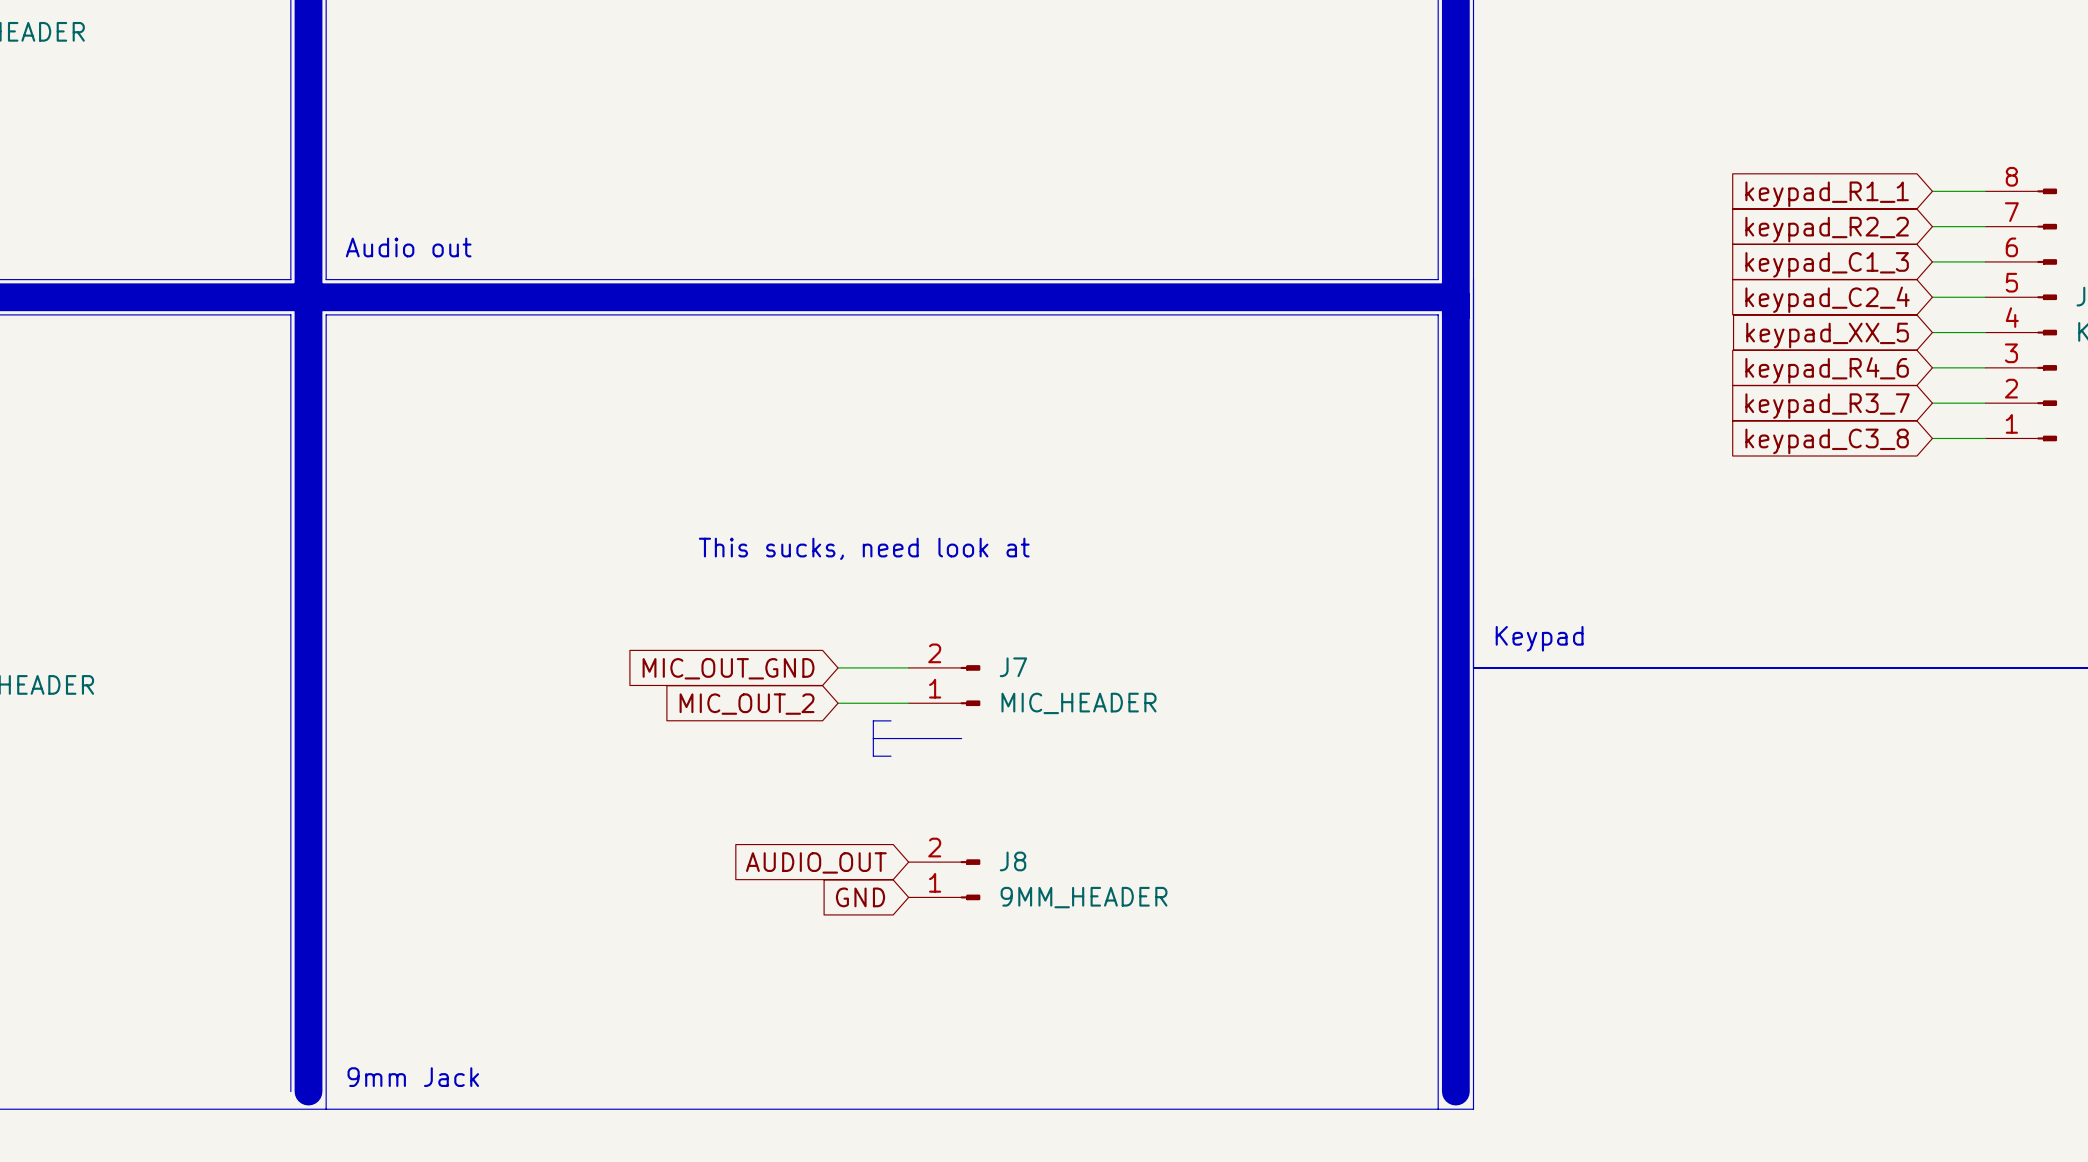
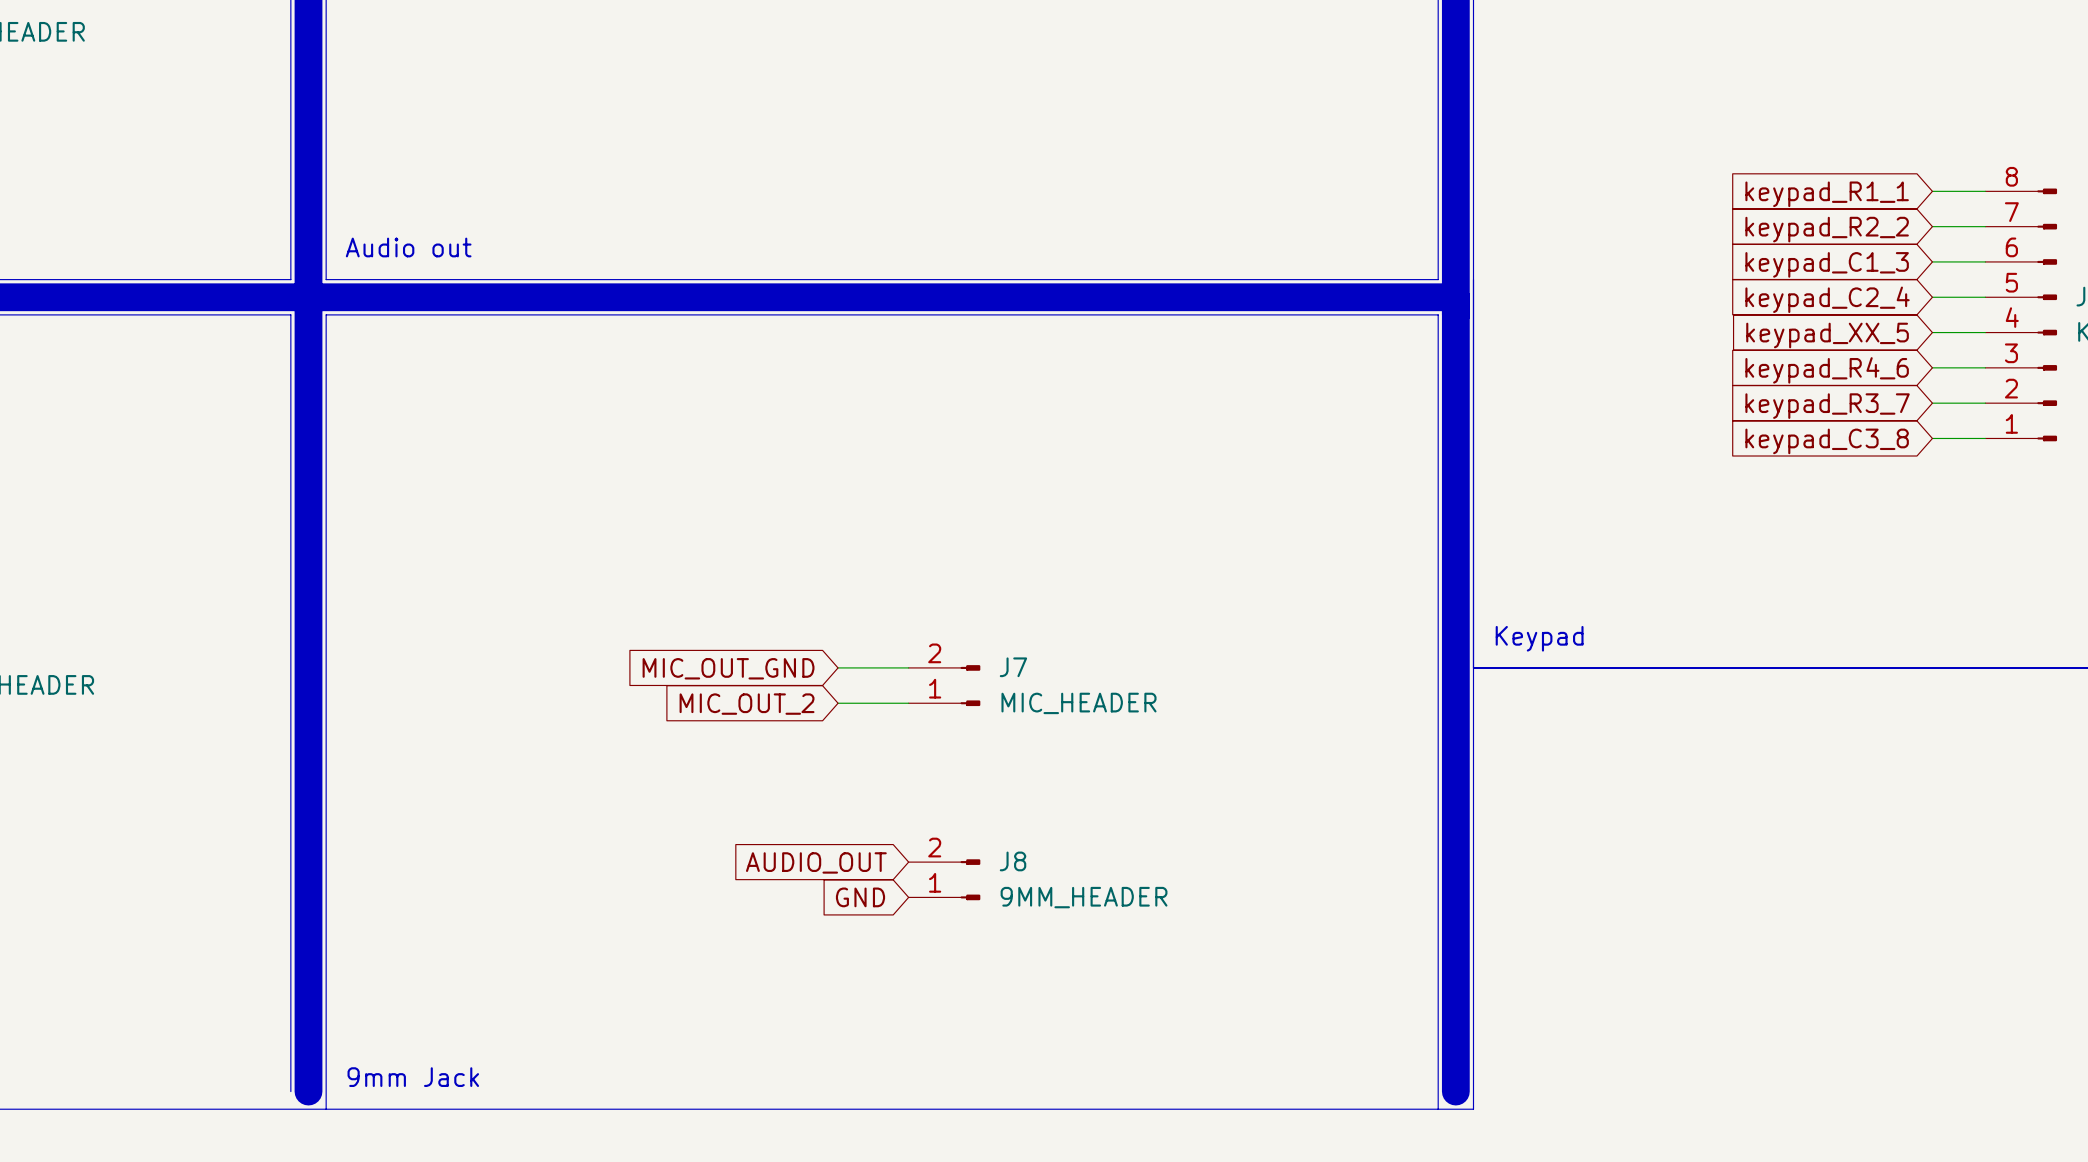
text: This sucks, need look at (864, 548) -> none
line: (891, 720) (873, 720) (873, 756) (891, 756) -> none
line: (873, 738) (961, 738) -> none

